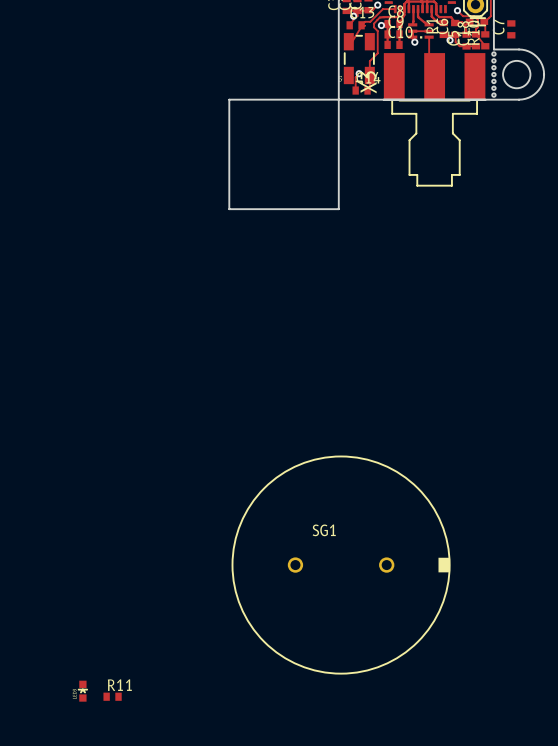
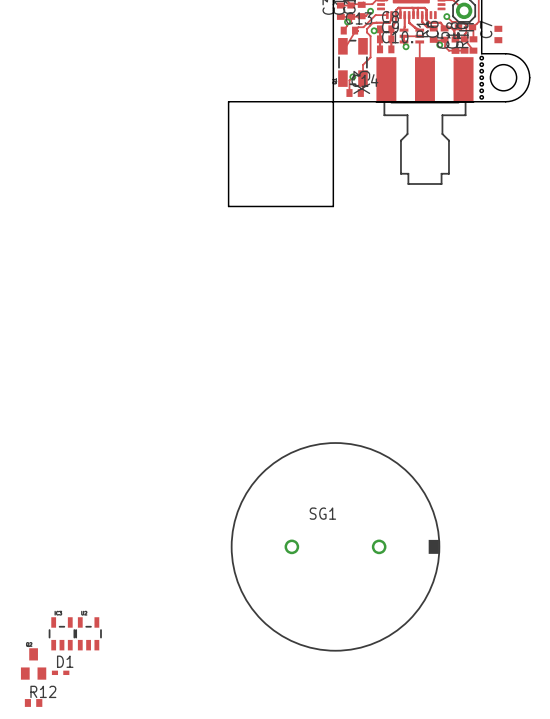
part: none -> (61, 633)
part: none -> (88, 633)
part: none -> (33, 663)
part: (82, 691) -> none
D1: none -> (60, 672)
R11: (112, 696) -> none
R12: none -> (33, 702)

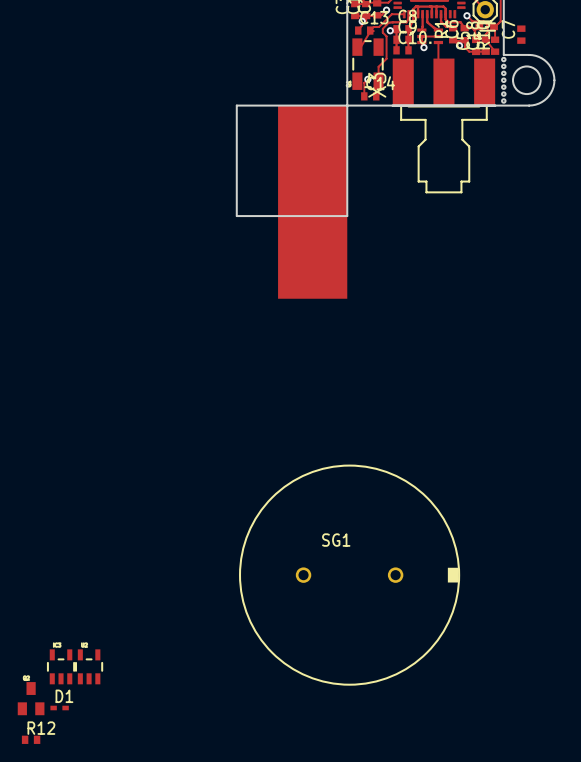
drawing: none -> [278, 105, 348, 299]

